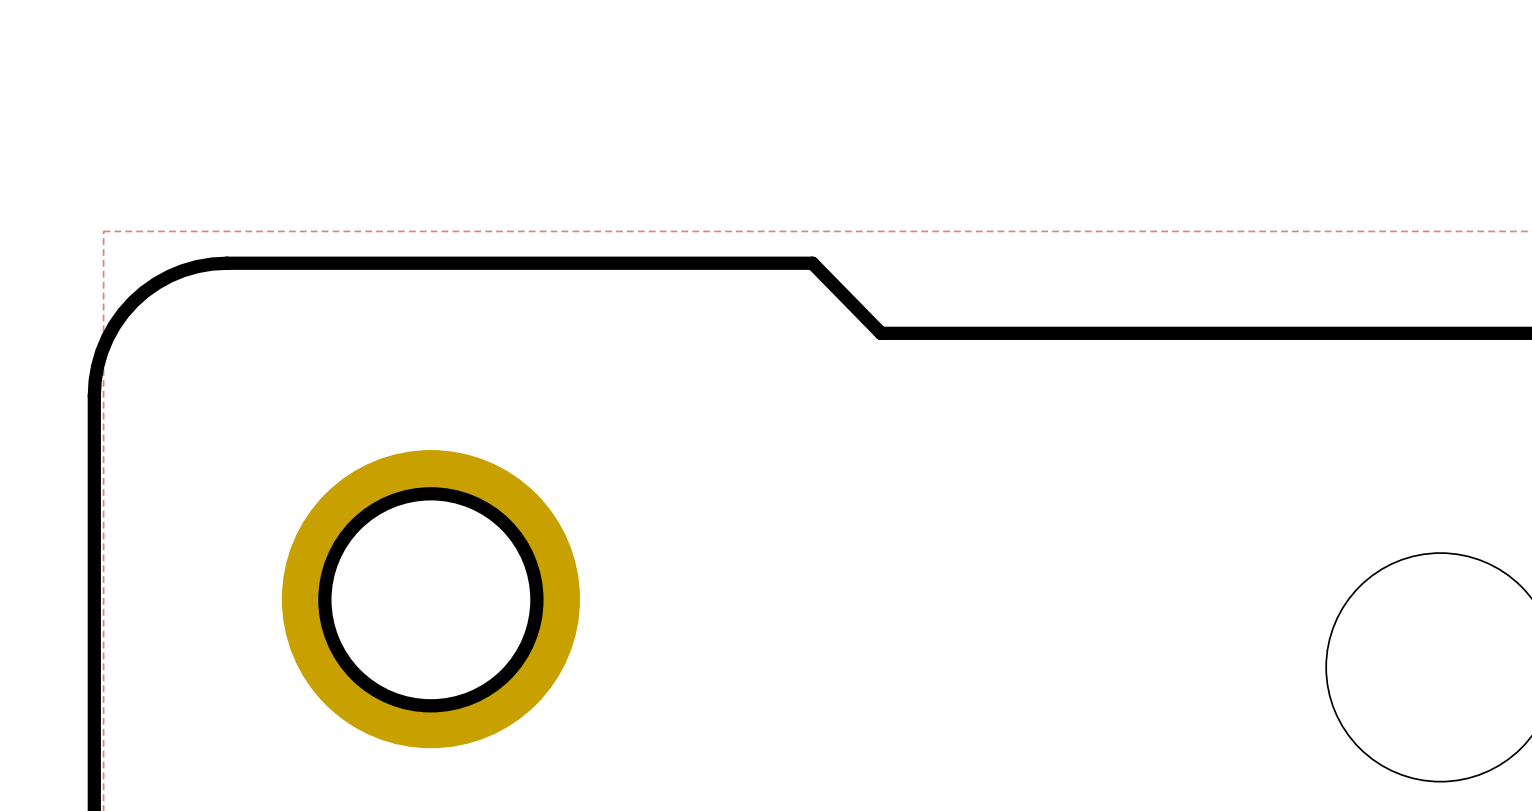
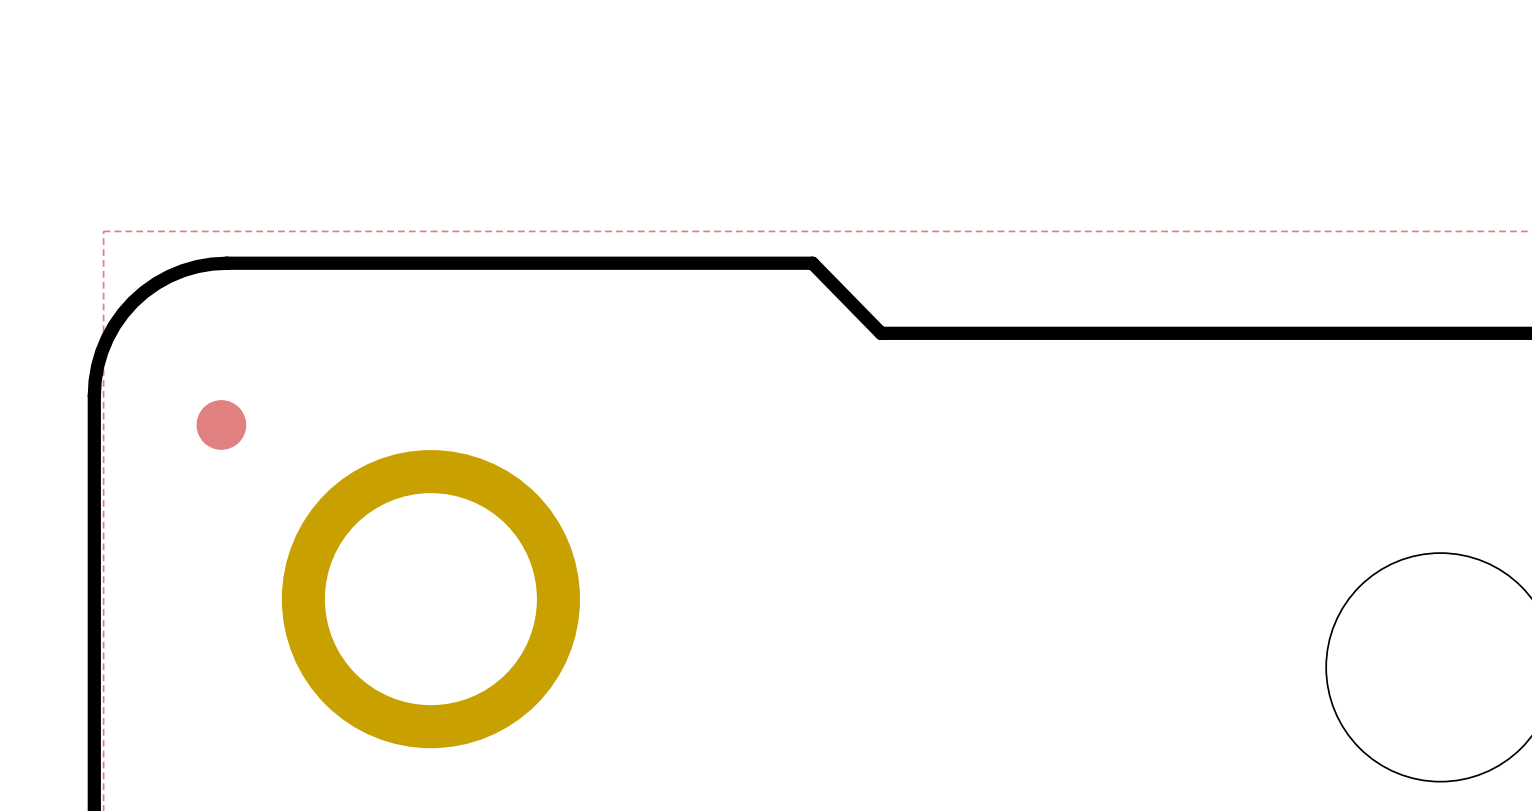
part: none -> (221, 424)
round board edge: [318, 487, 544, 713] -> none

